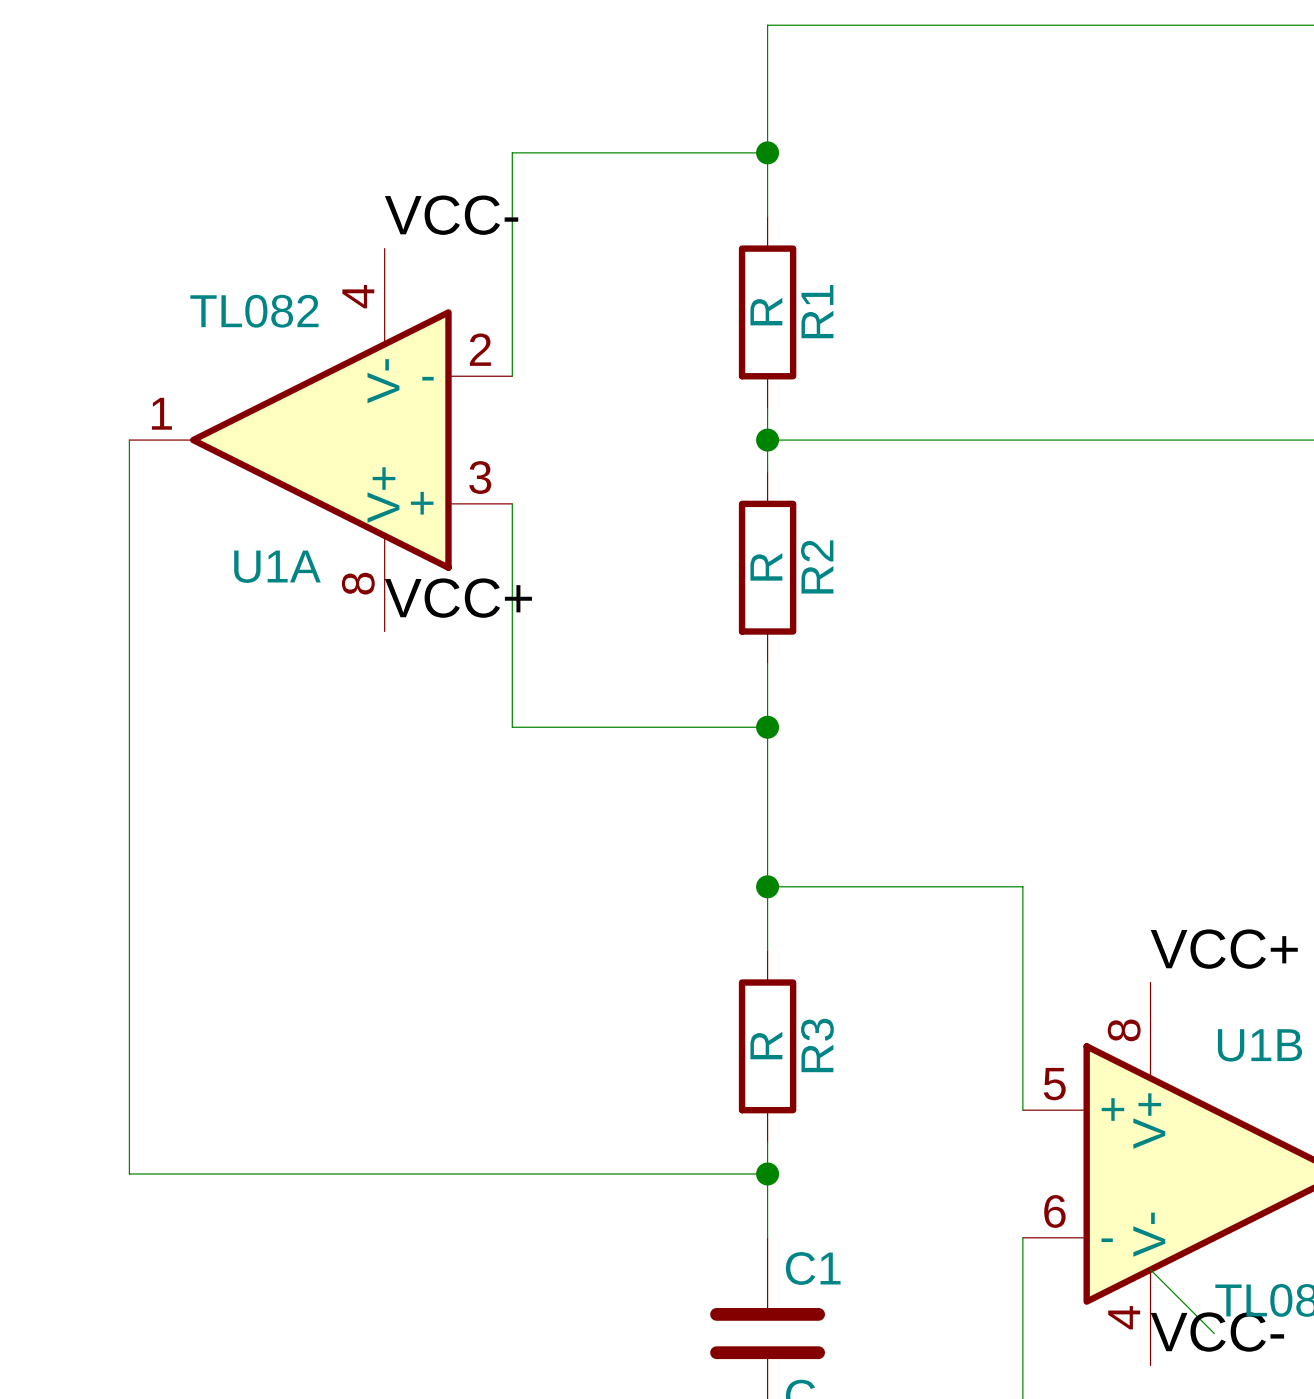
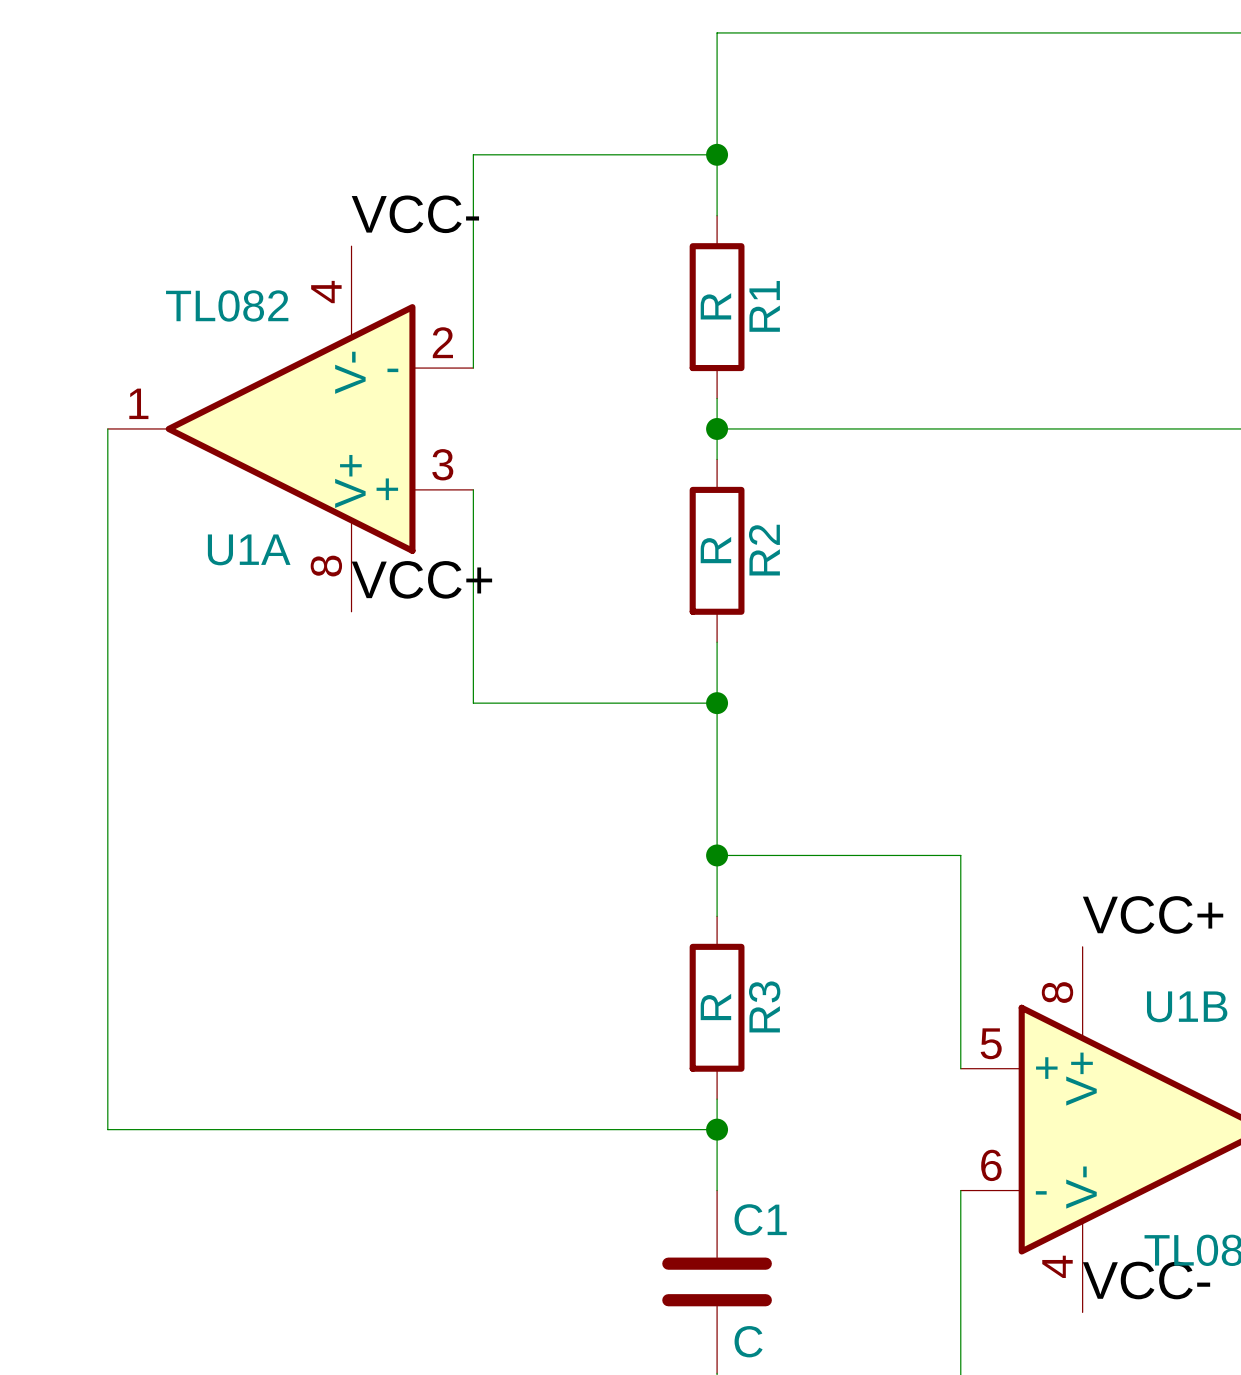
wire: (1150, 1269) (1214, 1333) -> none

